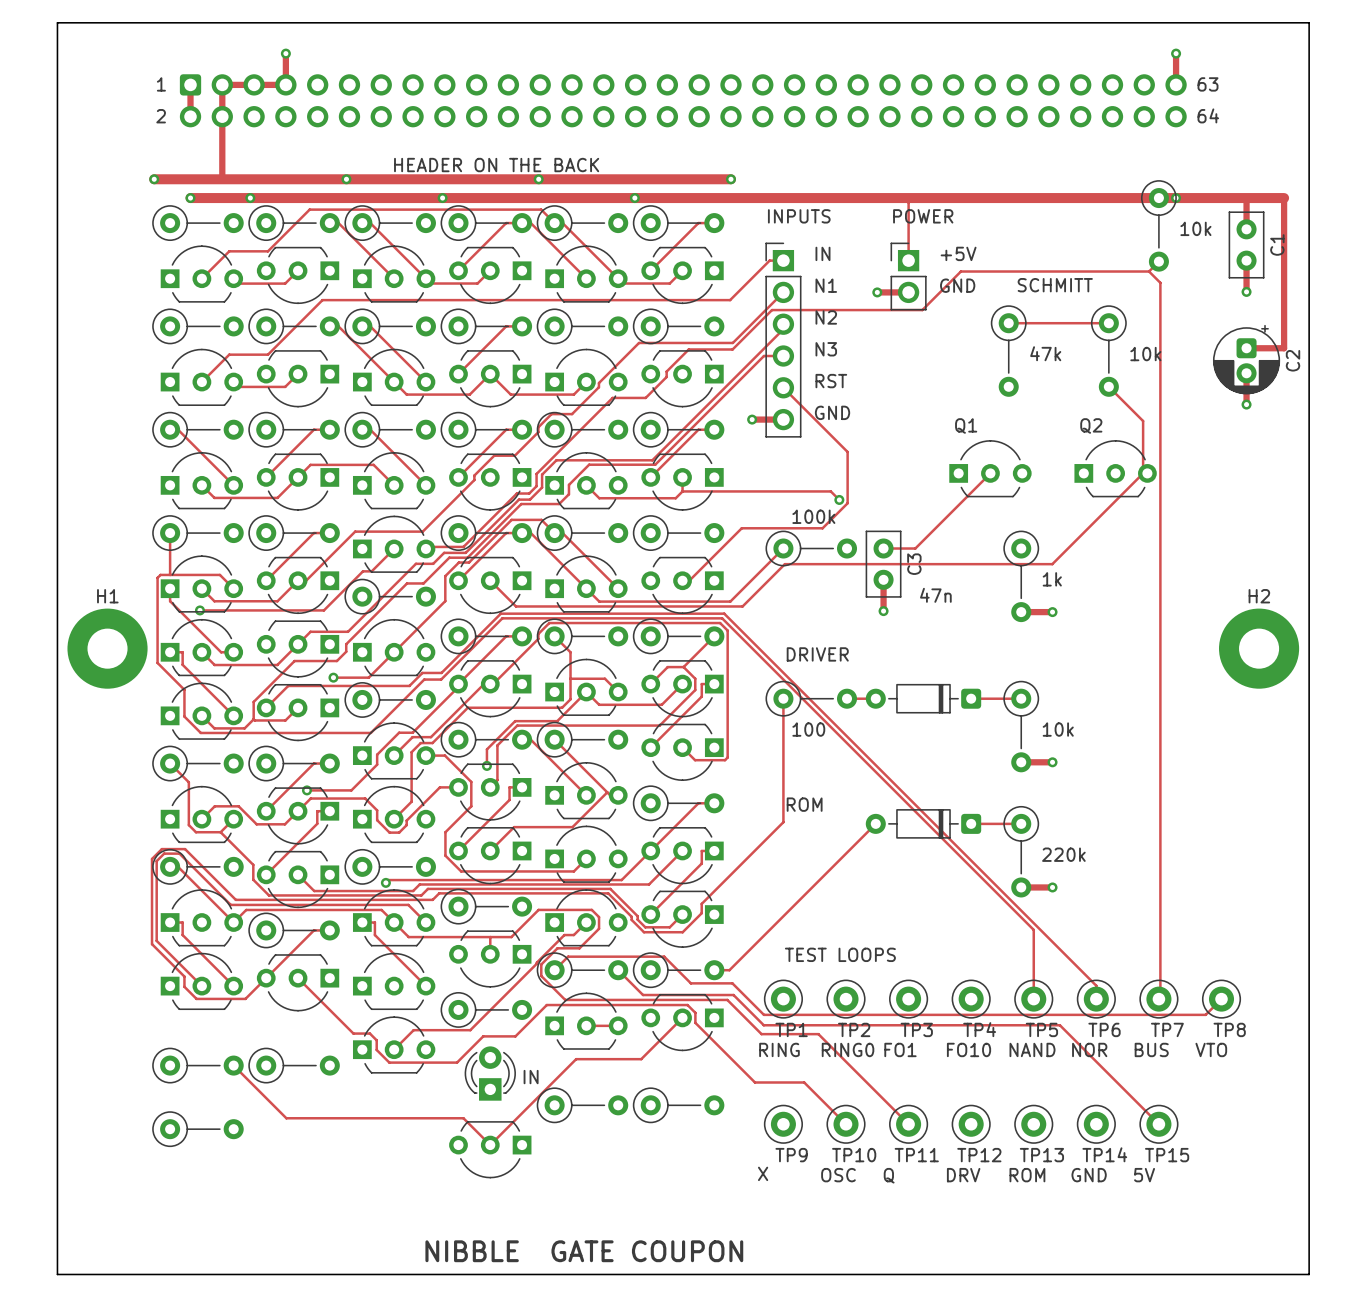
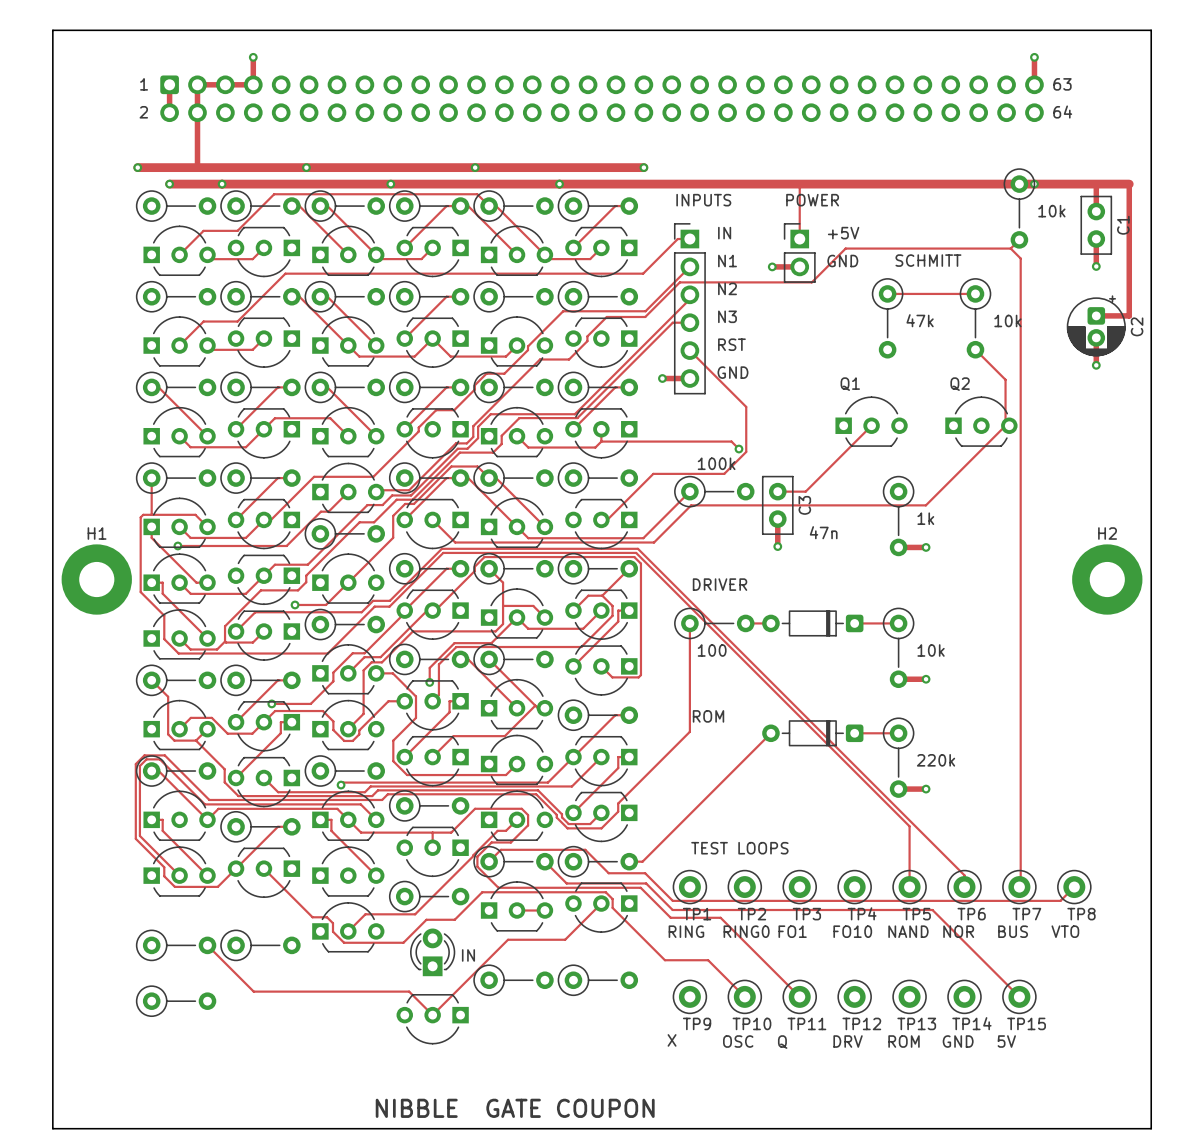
text: HEADER ON THE BACK (496, 165) -> none

